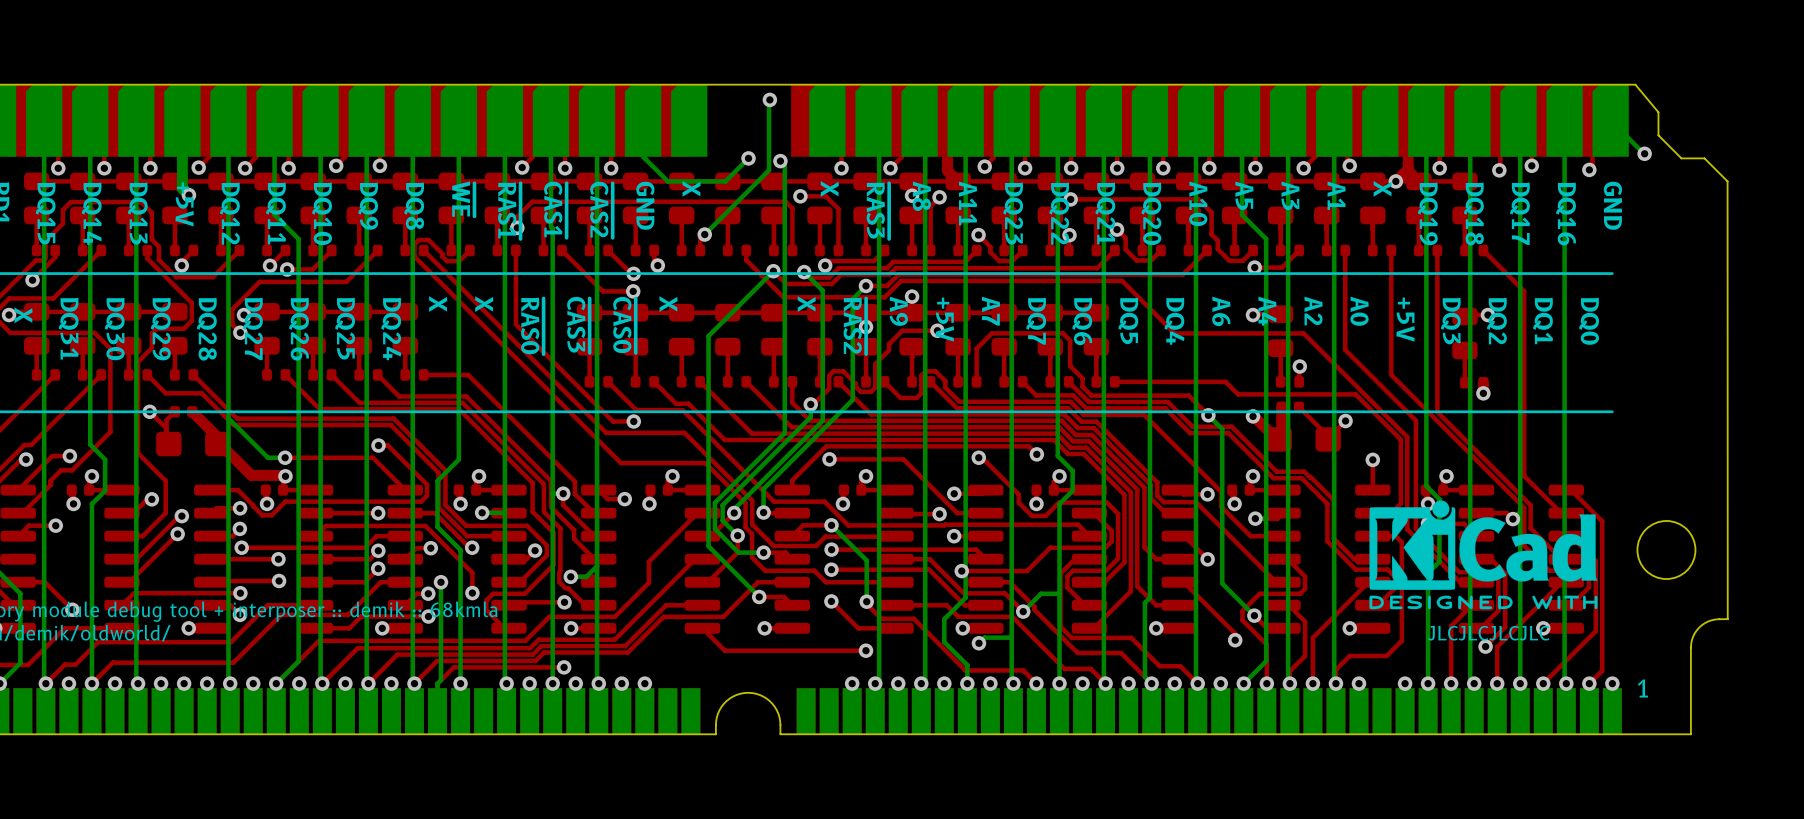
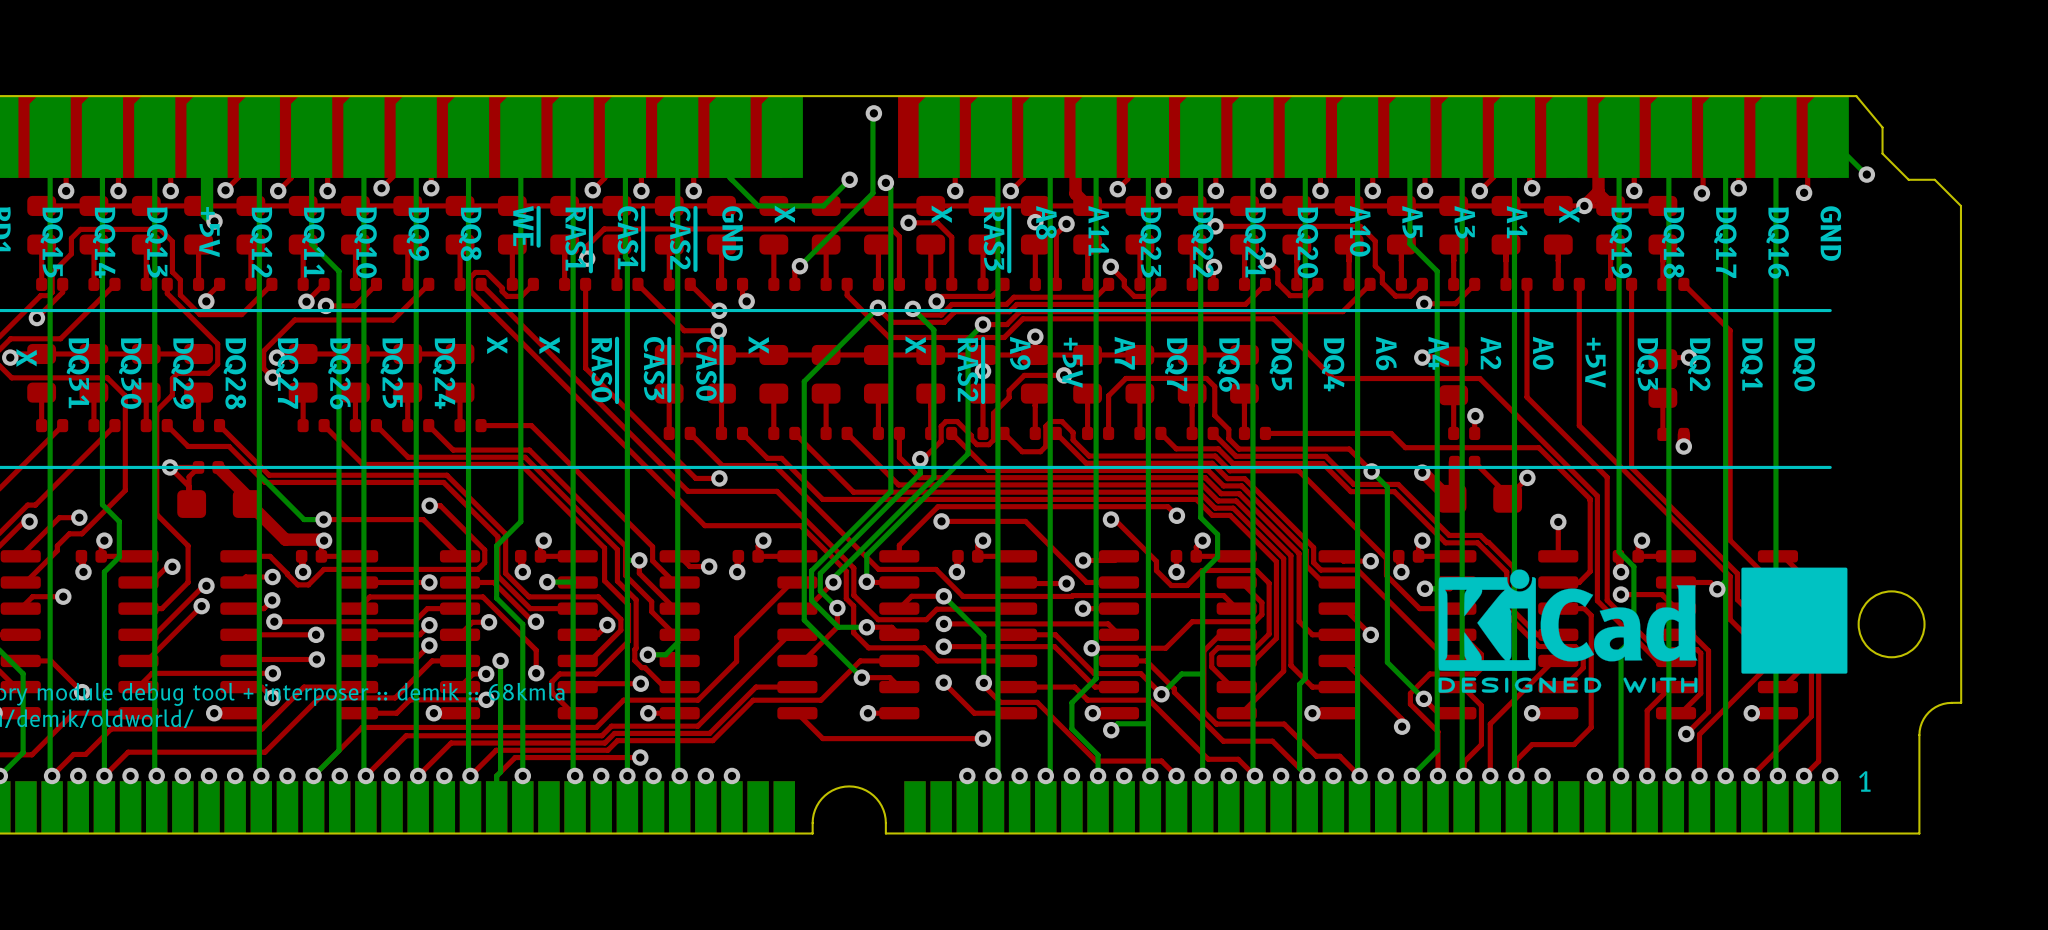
drawing: none -> [1741, 567, 1848, 674]
drawing position: (1483, 554) -> (1568, 631)
text: JLCJLCJLCJLC (1488, 633) -> none

